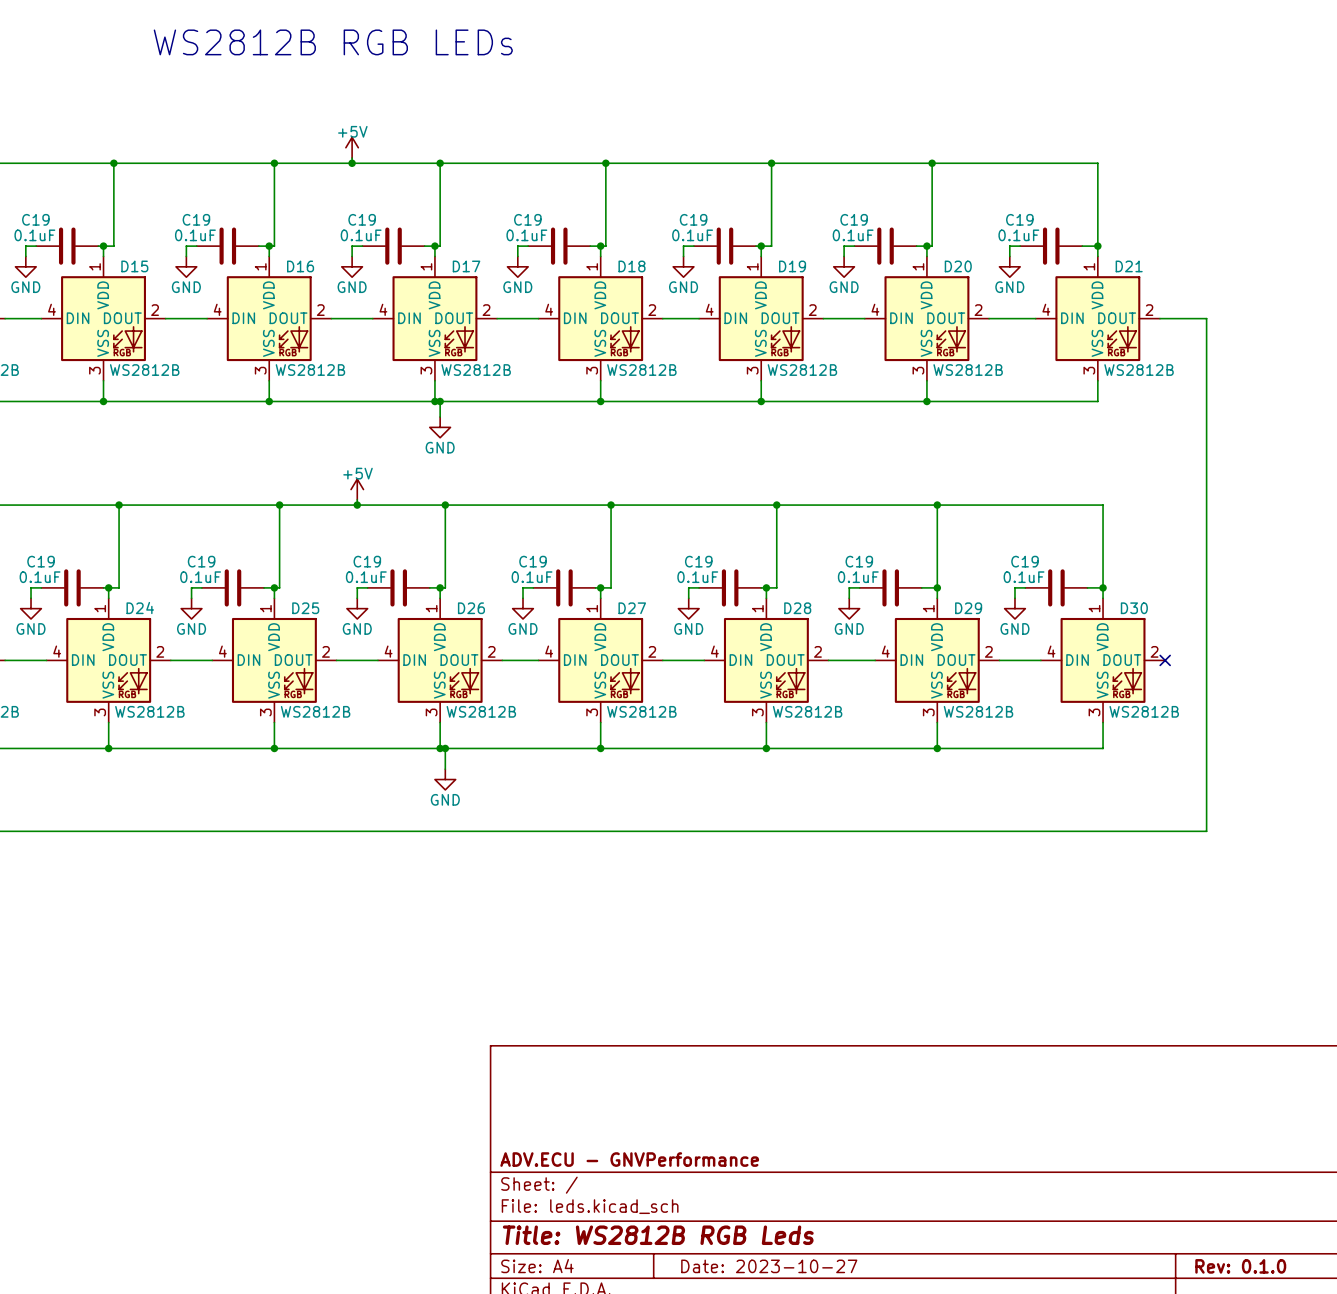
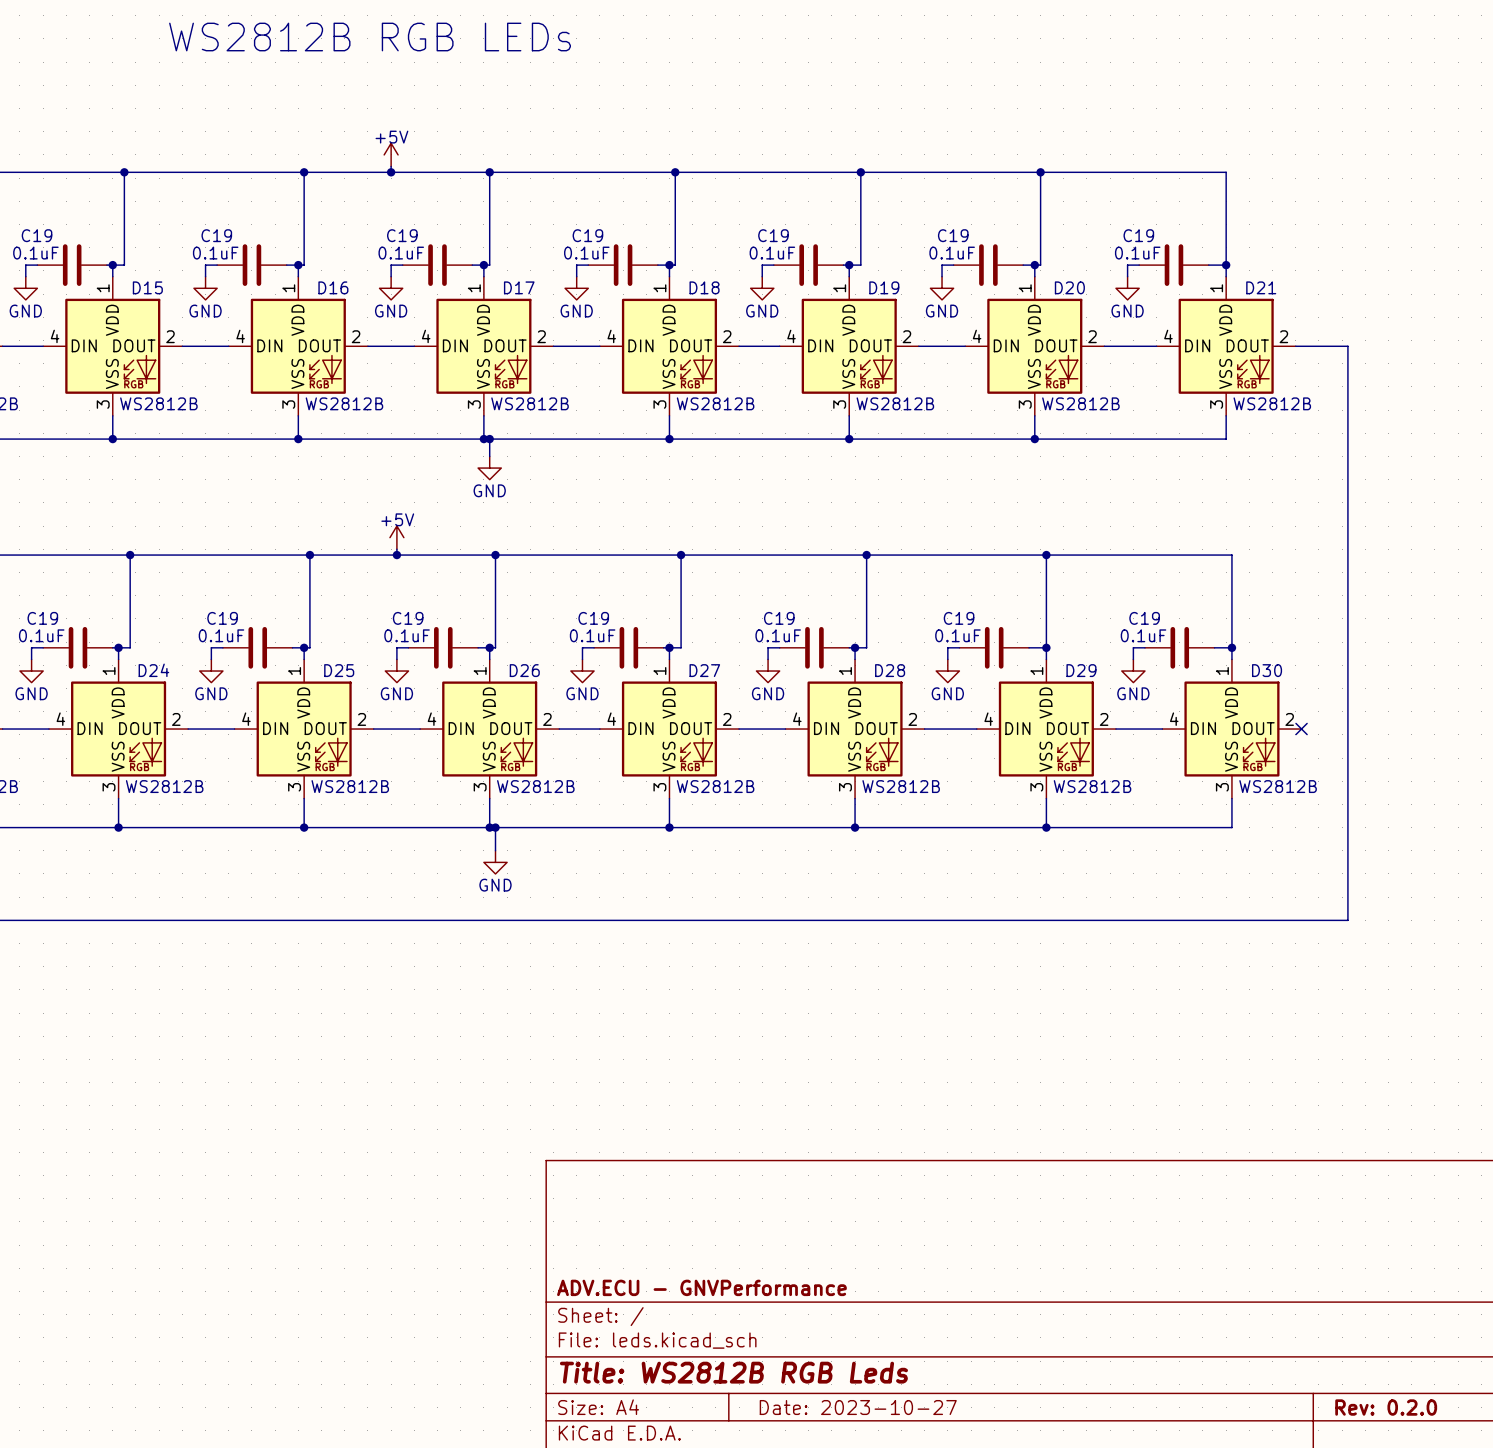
title block: Rev: 0.1.0 (1240, 1266) -> Rev: 0.2.0 (1386, 1407)

